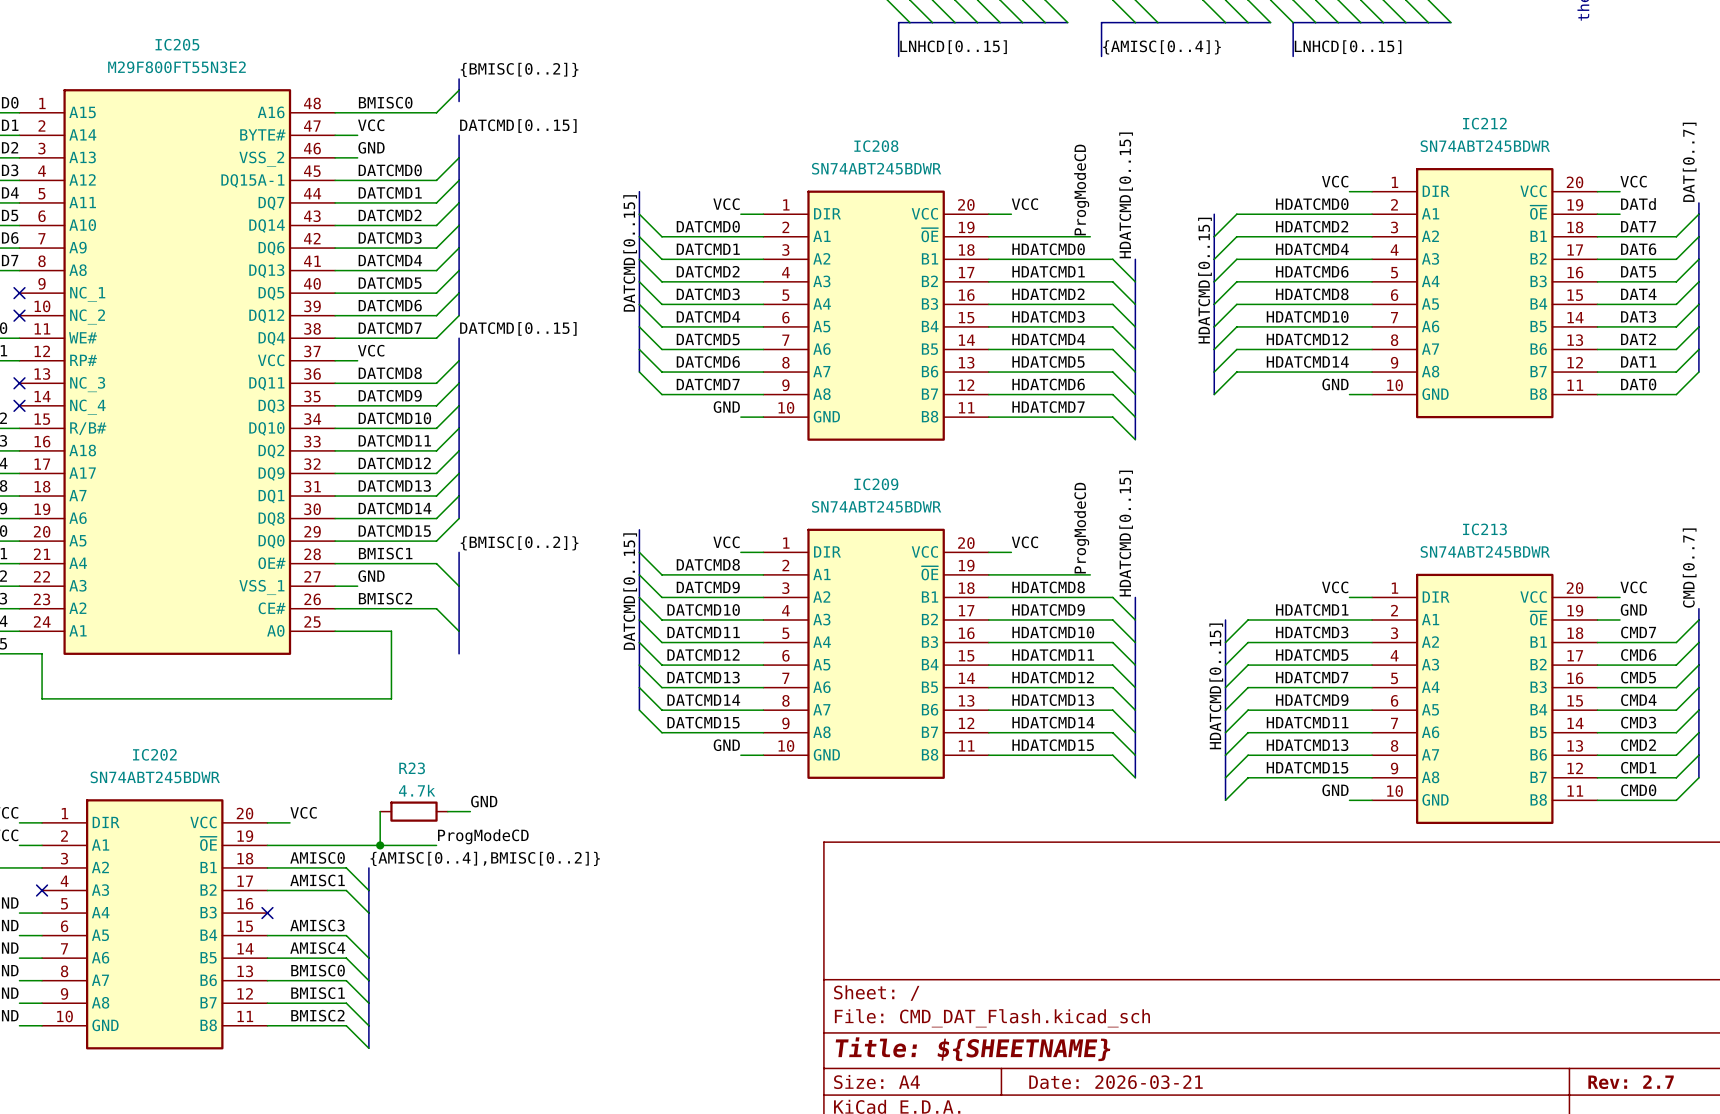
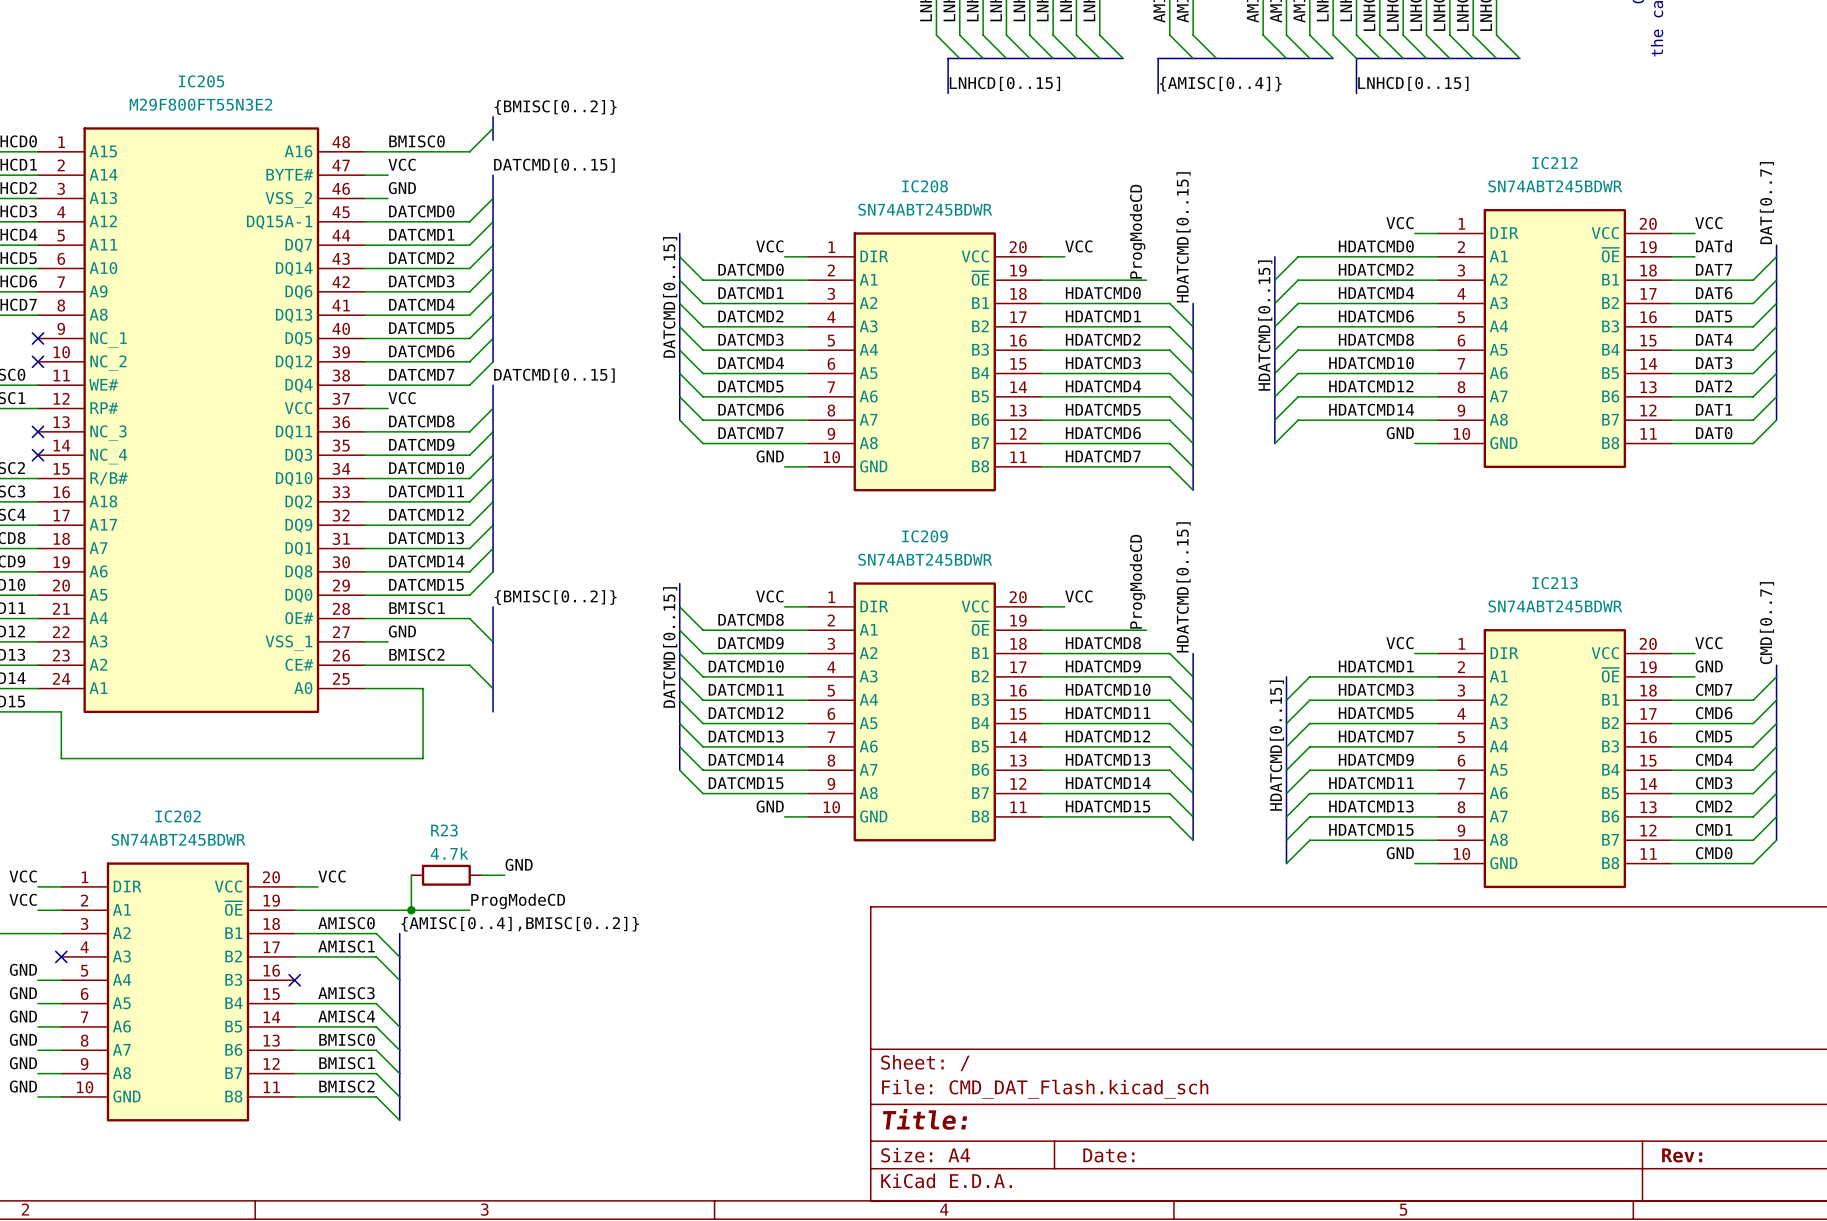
title block: Title: ${SHEETNAME} (972, 1049) -> Title: (925, 1119)
title block: Date: 2026-03-21 (1115, 1082) -> Date: (1108, 1155)
title block: Rev: 2.7 (1631, 1082) -> Rev: (1682, 1155)

